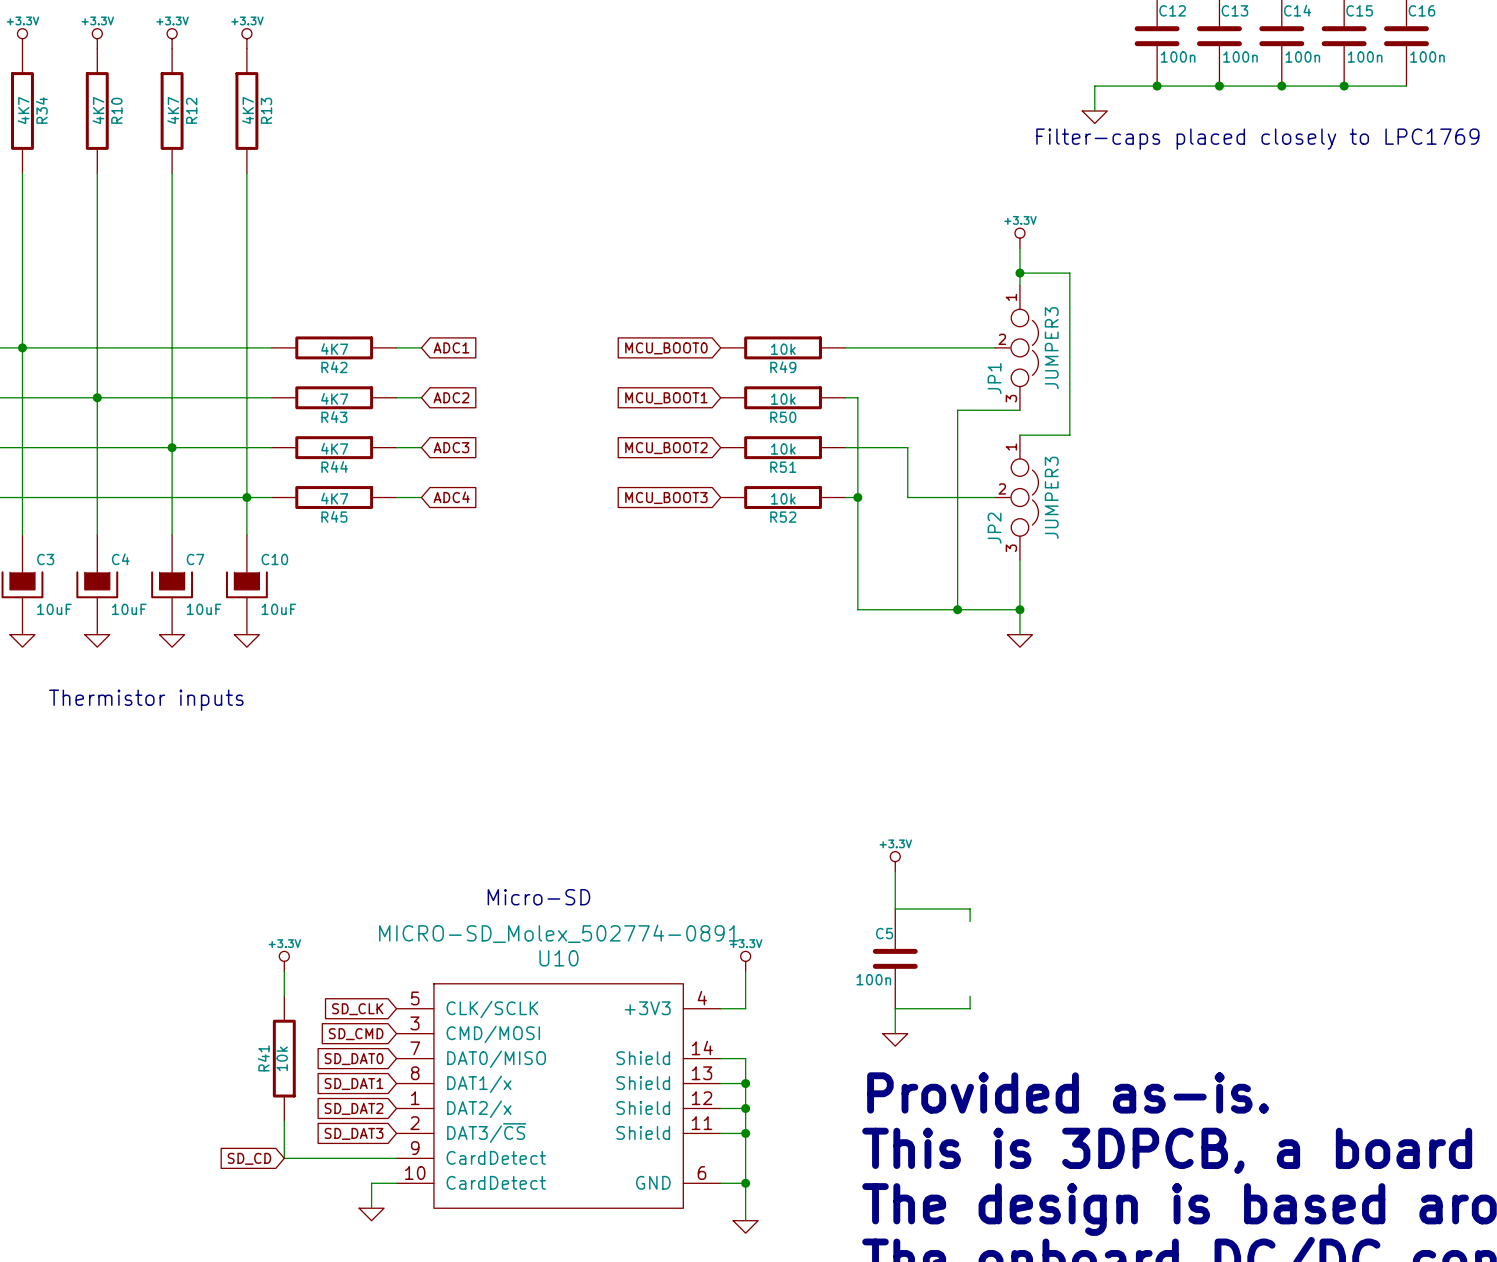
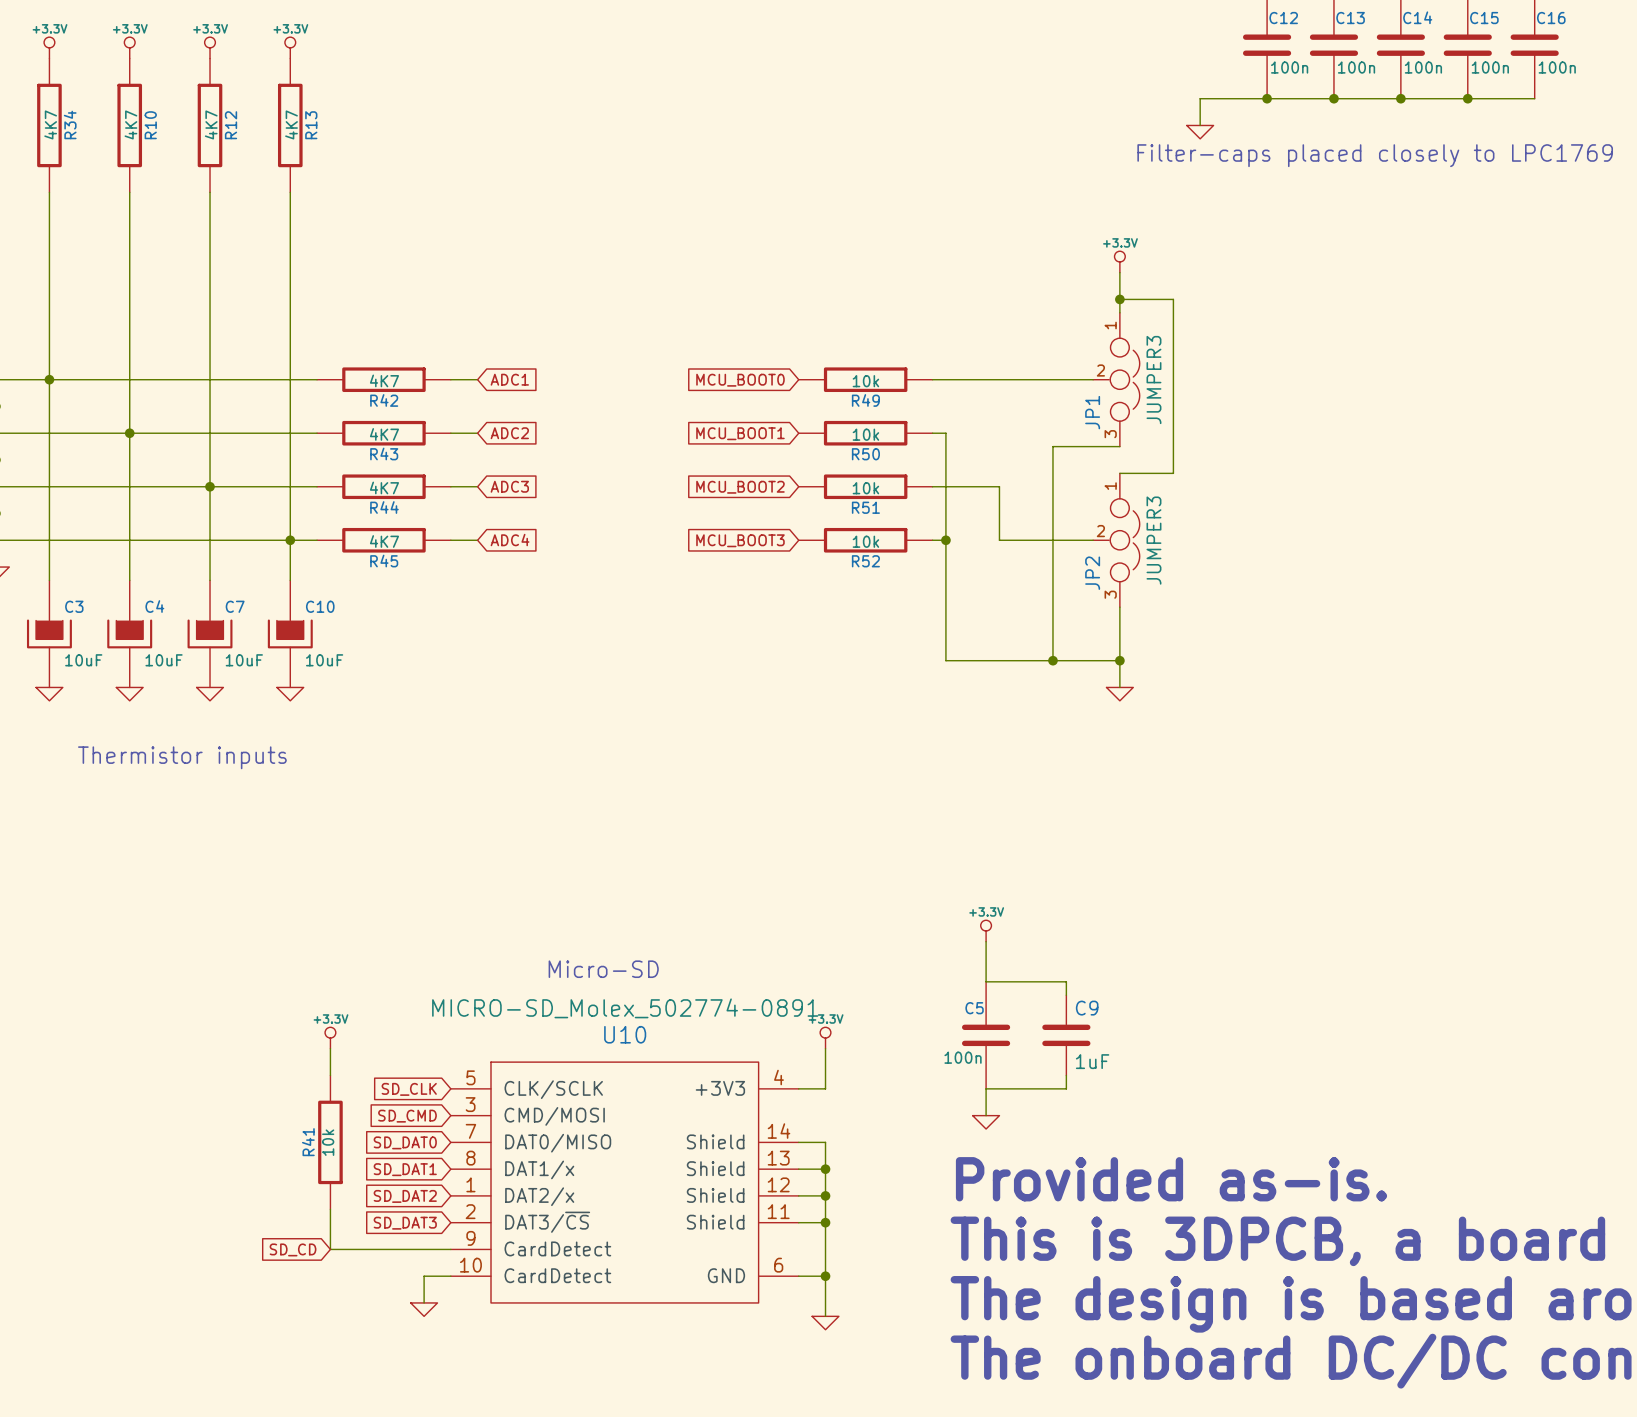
C9: none -> 1uF (1066, 1035)

